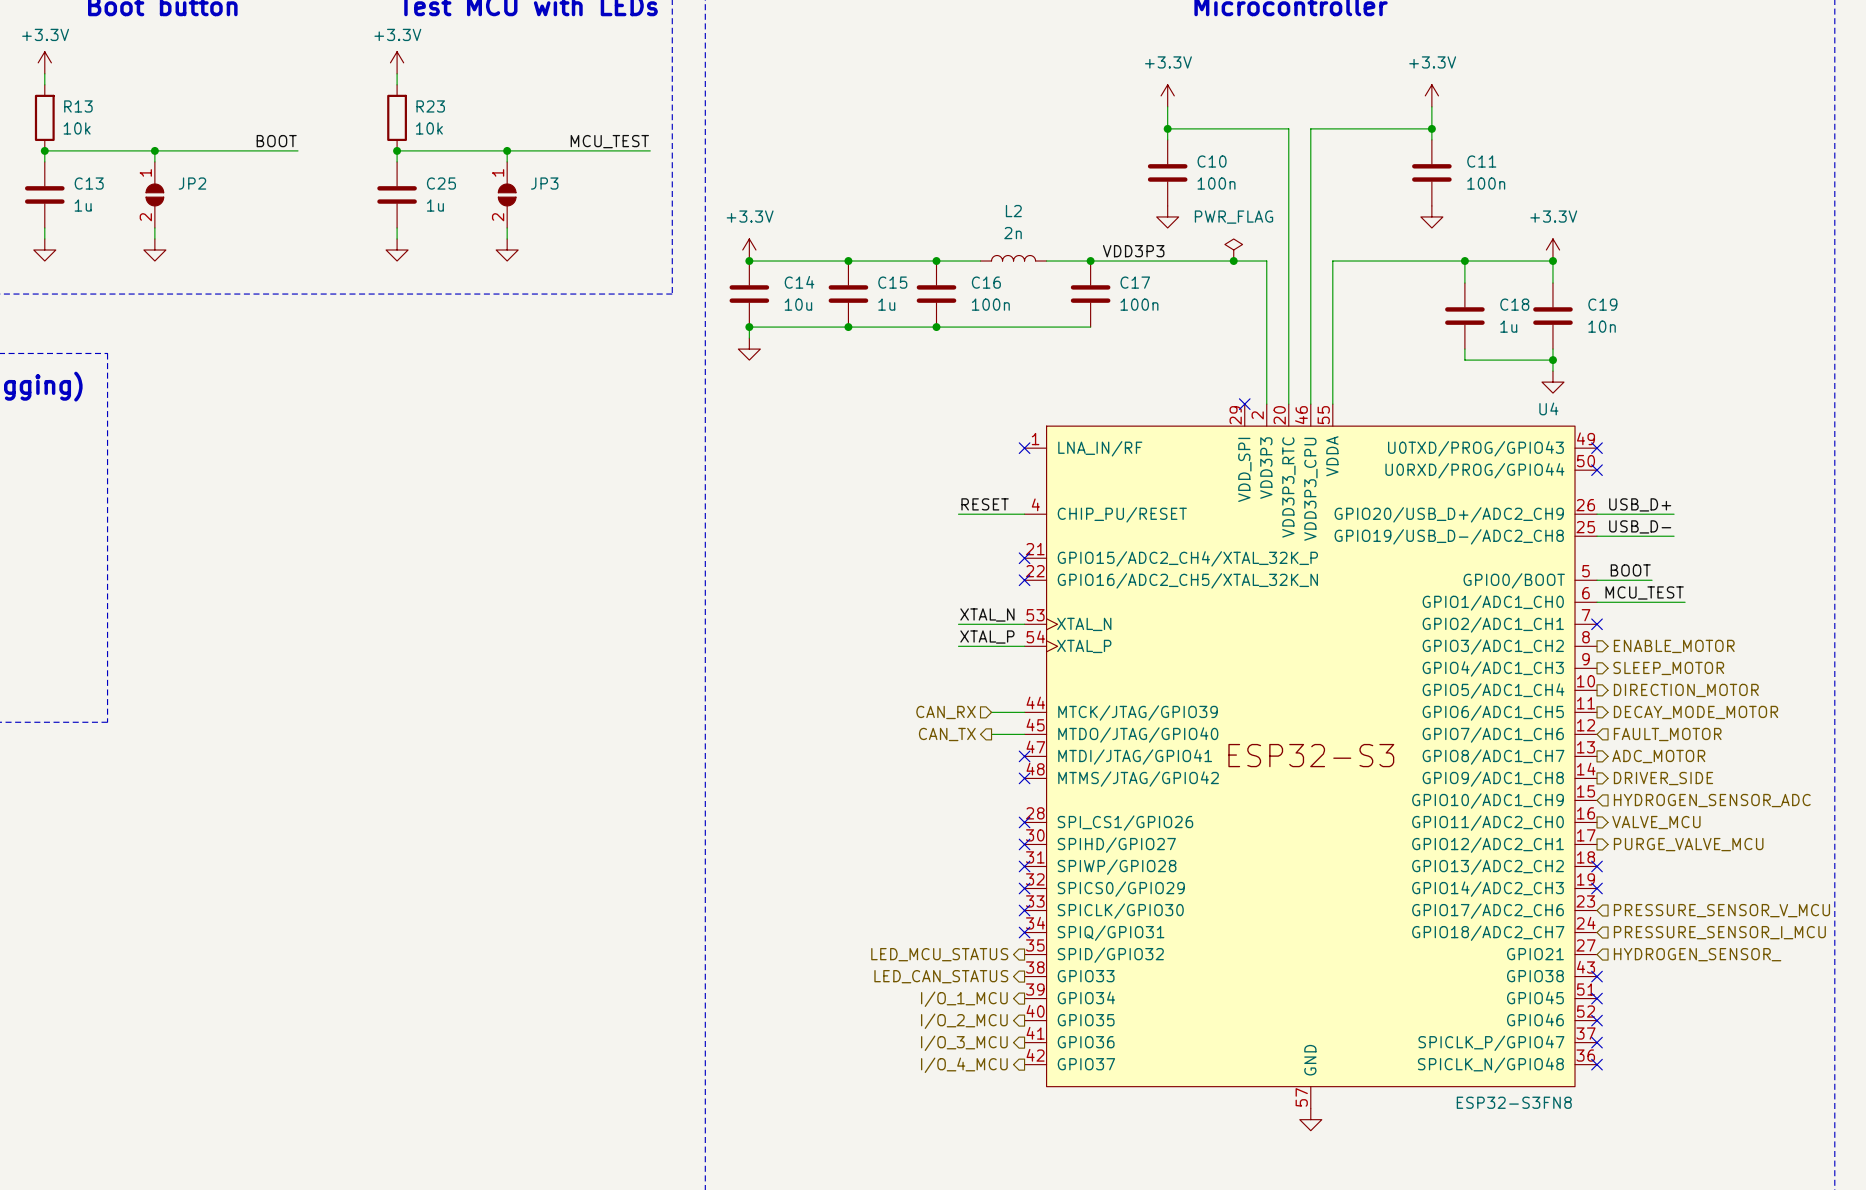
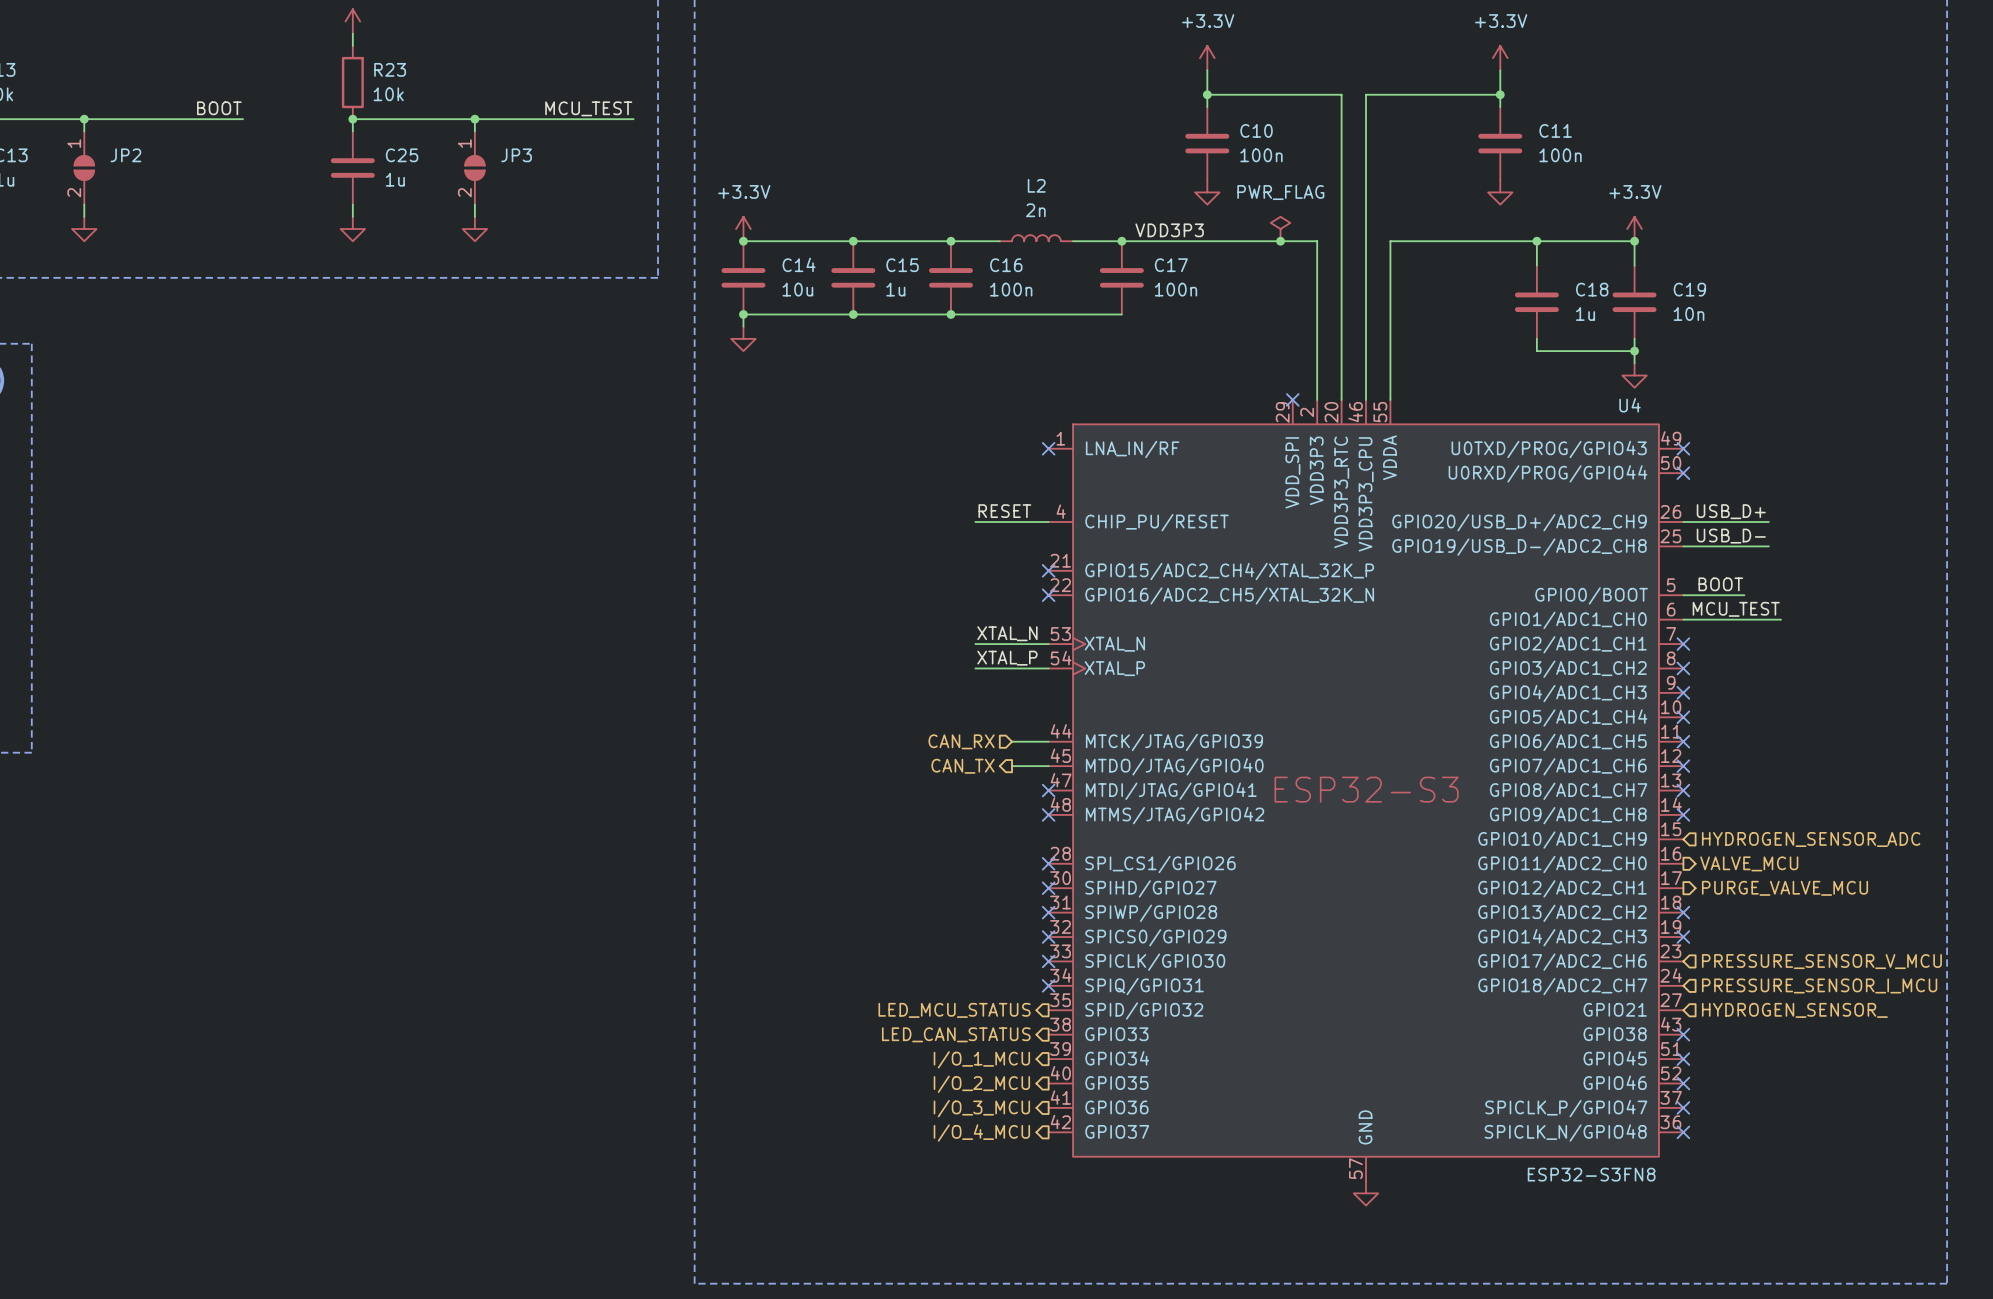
no-connect mark: none -> (1683, 668)
hierarchical label: ENABLE_MOTOR (1674, 646) -> none
no-connect mark: none -> (1683, 692)
hierarchical label: SLEEP_MOTOR (1668, 668) -> none
no-connect mark: none -> (1683, 717)
hierarchical label: DIRECTION_MOTOR (1686, 690) -> none
no-connect mark: none -> (1683, 741)
hierarchical label: DECAY_MODE_MOTOR (1696, 712) -> none
no-connect mark: none -> (1683, 766)
hierarchical label: FAULT_MOTOR (1667, 734) -> none
no-connect mark: none -> (1683, 790)
hierarchical label: ADC_MOTOR (1658, 756) -> none
no-connect mark: none -> (1683, 814)
hierarchical label: DRIVER_SIDE (1663, 778) -> none

